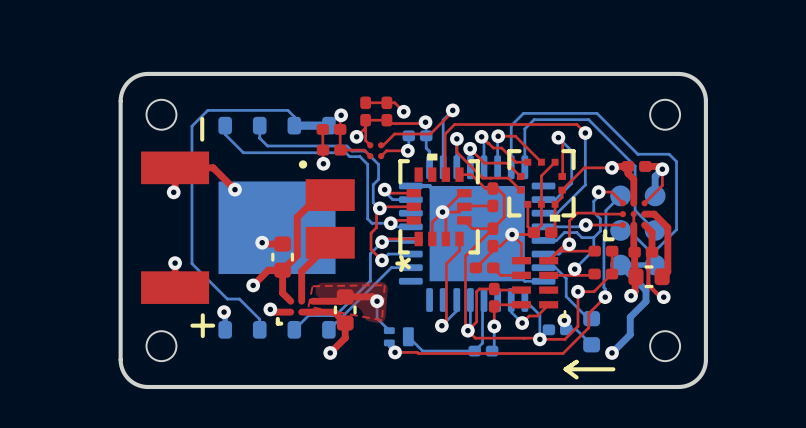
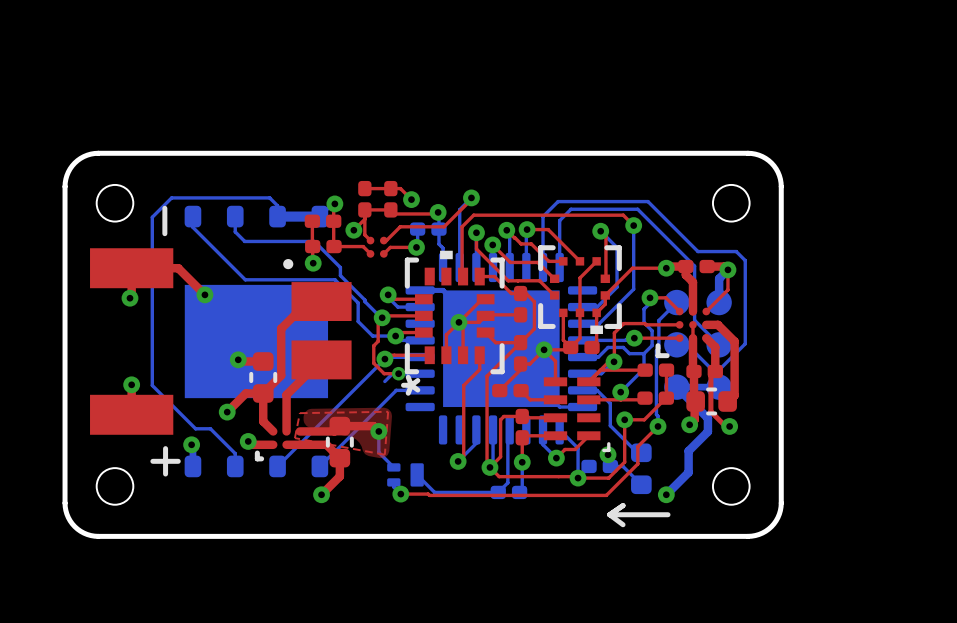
bottom track: (324, 145) (346, 145) (351, 151) (365, 151) (378, 164) (378, 179) (373, 184) (373, 202) -> (314, 241) (340, 267) (340, 275) (374, 310)
bottom track: (243, 152) (345, 152) (349, 156) (359, 156) (367, 164) (367, 218) -> (215, 249) (245, 279) (335, 279) (358, 302) (358, 321) (367, 330)
top track: (372, 231) (371, 233) (371, 249) (381, 260) -> (373, 345) (373, 363) (384, 373) (401, 373)
bottom track: (370, 253) (370, 280) (335, 315) (308, 315) -> (370, 373) (294, 449)
via position: (381, 260) -> (398, 373)

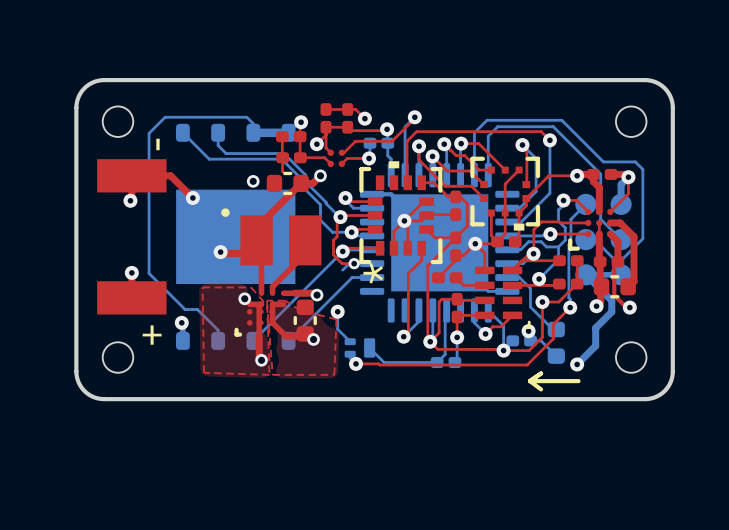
bottom track: (192, 216) (192, 227) (245, 279) (335, 279) -> (182, 132) (209, 159) (281, 159) (300, 177) (301, 185)
via: (313, 263) -> none
top track: none -> (320, 175) (312, 183) (301, 183) (256, 227) (256, 240)
via: none -> (320, 175)
via: none -> (253, 181)
top track: (321, 301) (308, 301) (281, 328) (281, 375) (263, 393) -> none
part: (317, 319) -> none
part: none -> (271, 236)
top track: none -> (261, 245) (261, 293)
top track: (321, 359) (286, 394) (286, 431) -> none
top track: none -> (305, 254) (272, 286) (272, 293)
part rotation: 0° (263, 377) -> 90° clockwise (287, 183)
part position: (263, 377) -> (287, 183)
top track: (263, 393) (245, 393) (227, 412) -> none
top track: (263, 393) (263, 421) (273, 431) -> none
top zone outline: none -> (202, 287) (251, 287) (267, 305) (269, 374) (203, 372) (202, 287)
top track: none -> (283, 293) (315, 293) (317, 295)
via: none -> (317, 295)
top zone outline: (388, 411) (299, 413) (294, 438) (384, 454) (388, 411) -> none
via: (227, 412) -> none
top track: none -> (244, 298) (250, 304) (261, 304) (259, 306) (259, 358) (261, 360)
via: none -> (244, 298)
top zone outline: none -> (267, 300) (285, 300) (300, 310) (336, 319) (334, 374) (272, 374) (267, 300)
top track: none -> (283, 304) (272, 304) (272, 322) (285, 336) (310, 336) (313, 339)
top track: (299, 431) (334, 431) (339, 426) (373, 426) (378, 431) -> none
top track: (248, 441) (251, 444) (273, 444) -> none
via: (248, 441) -> none
top track: (286, 444) (326, 444) (339, 458) (339, 476) (321, 494) -> none
via: none -> (313, 339)
via: none -> (261, 360)
via: (321, 494) -> none

